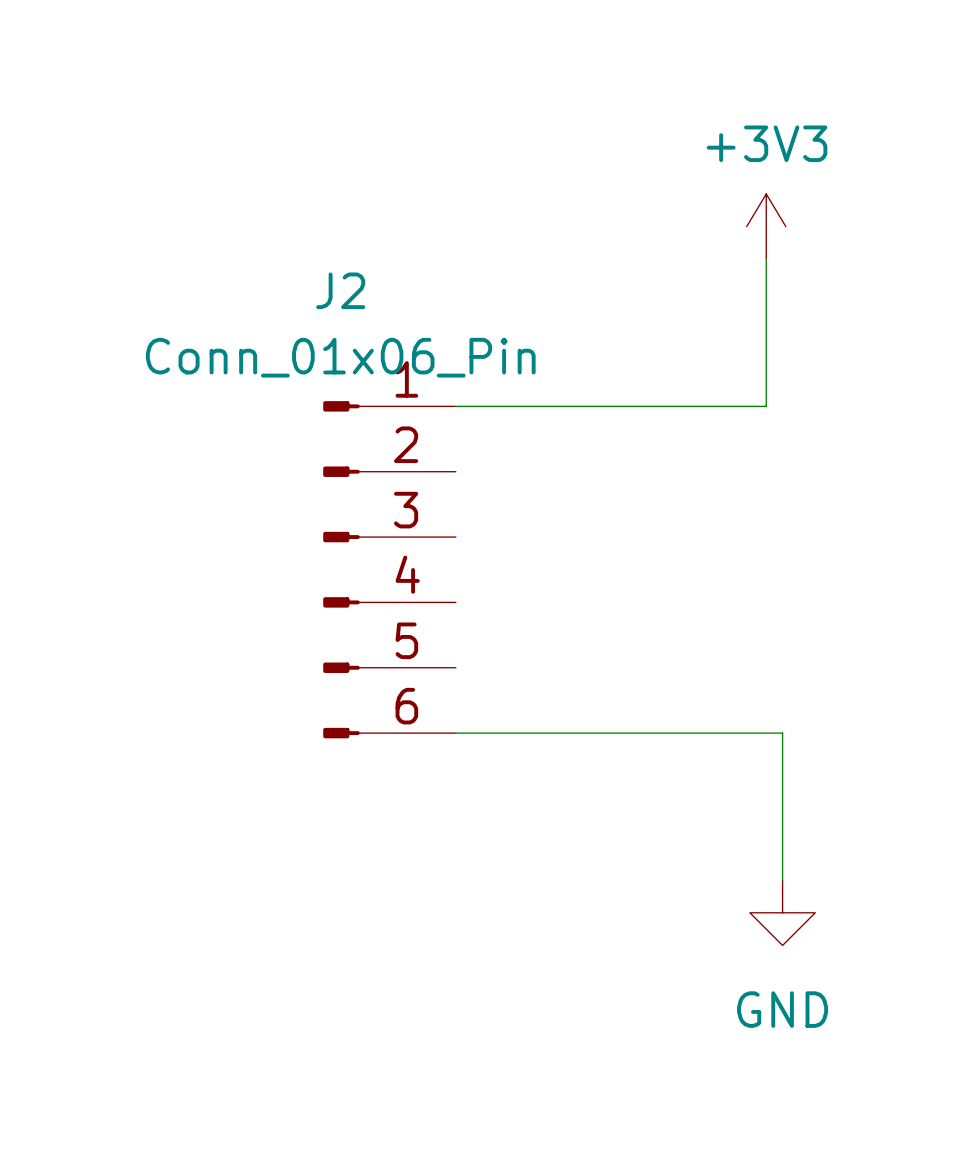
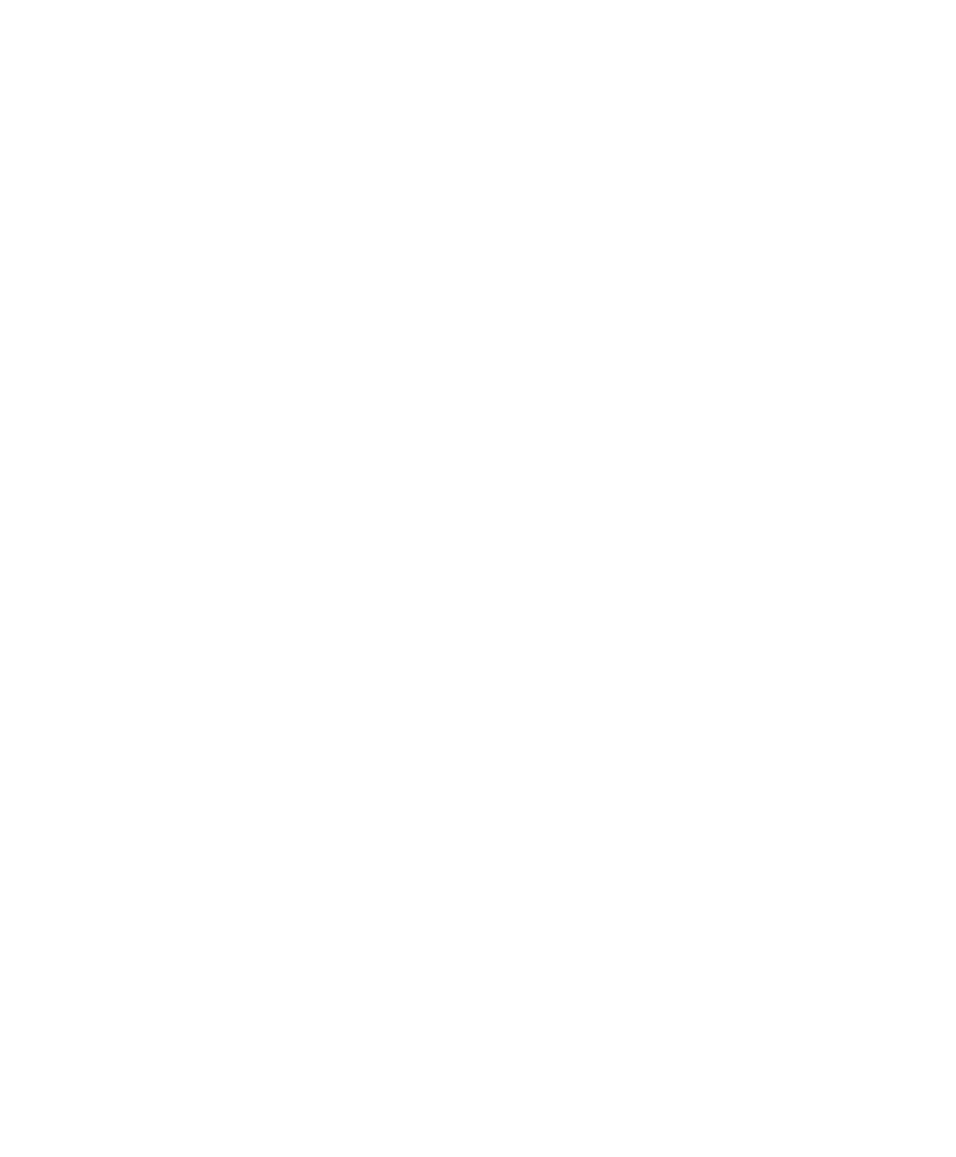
power symbol: +3V3 (766, 226) -> none
wire: (766, 259) (766, 406) (455, 406) -> none
J2: Conn_01x06_Pin (389, 569) -> none
wire: (455, 733) (782, 733) (782, 880) -> none
power symbol: GND (782, 912) -> none

